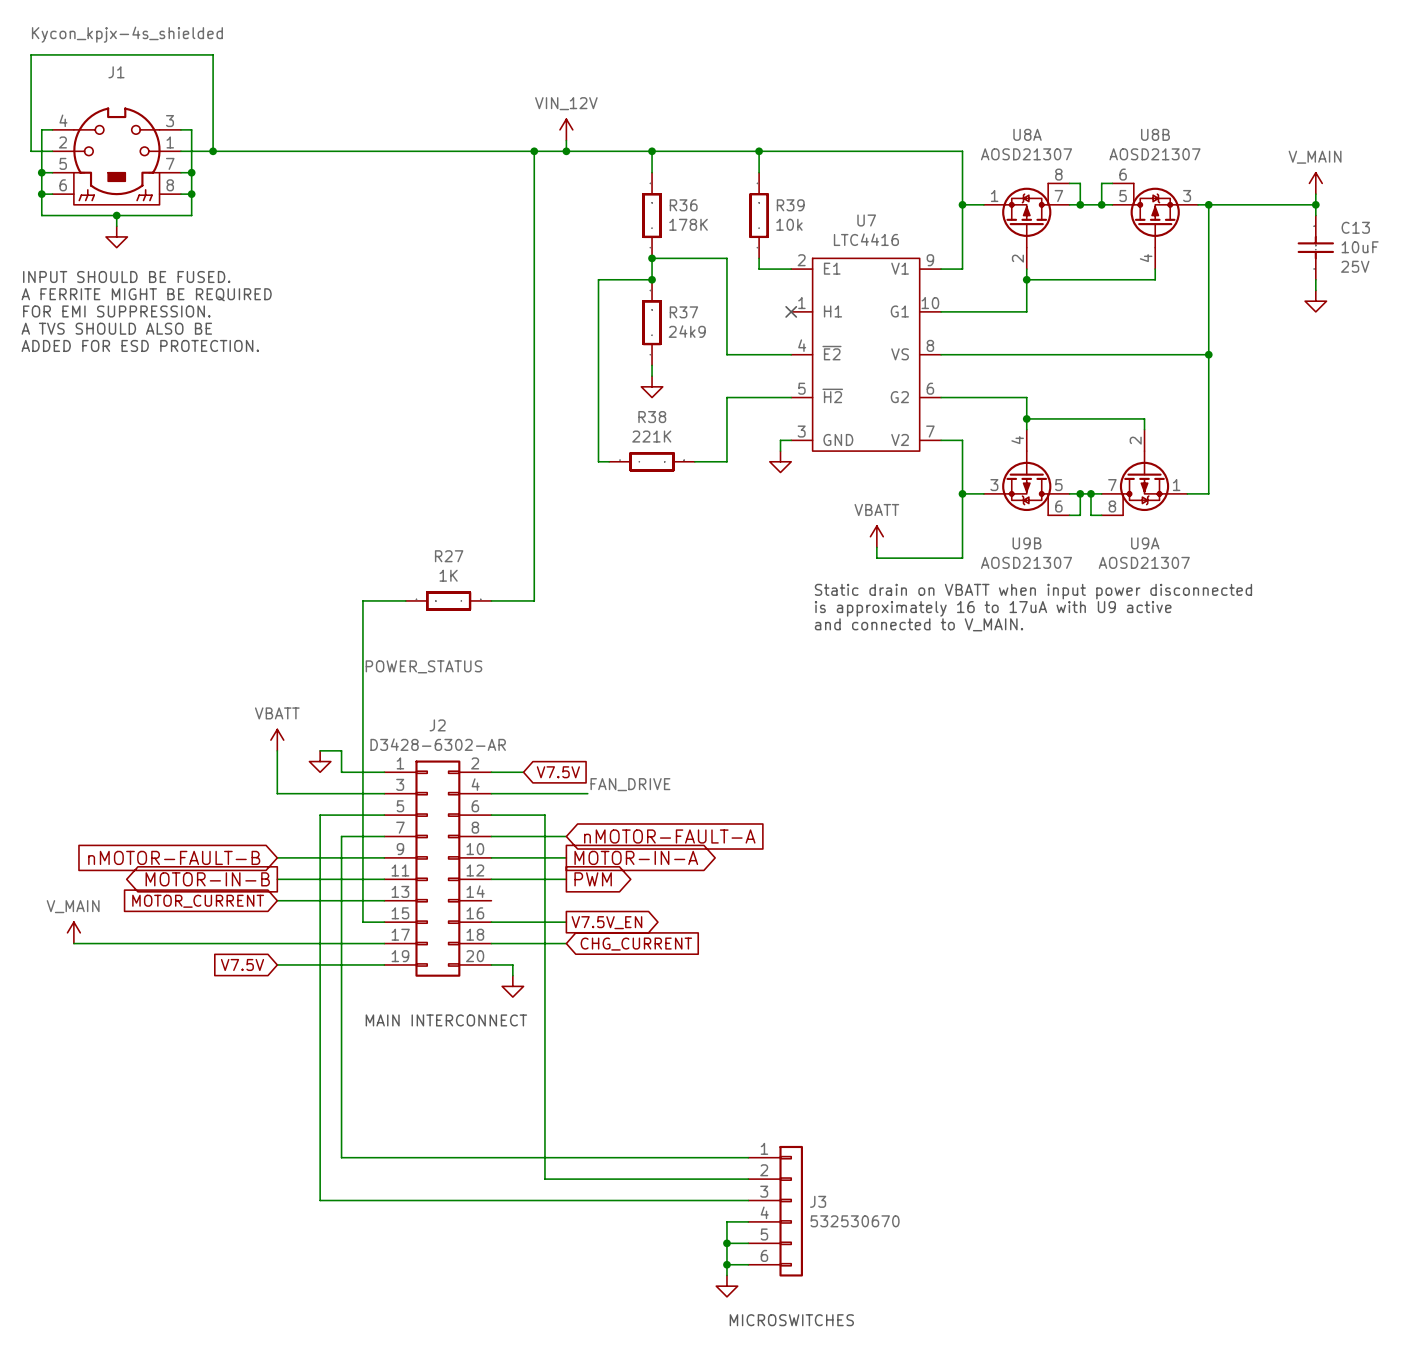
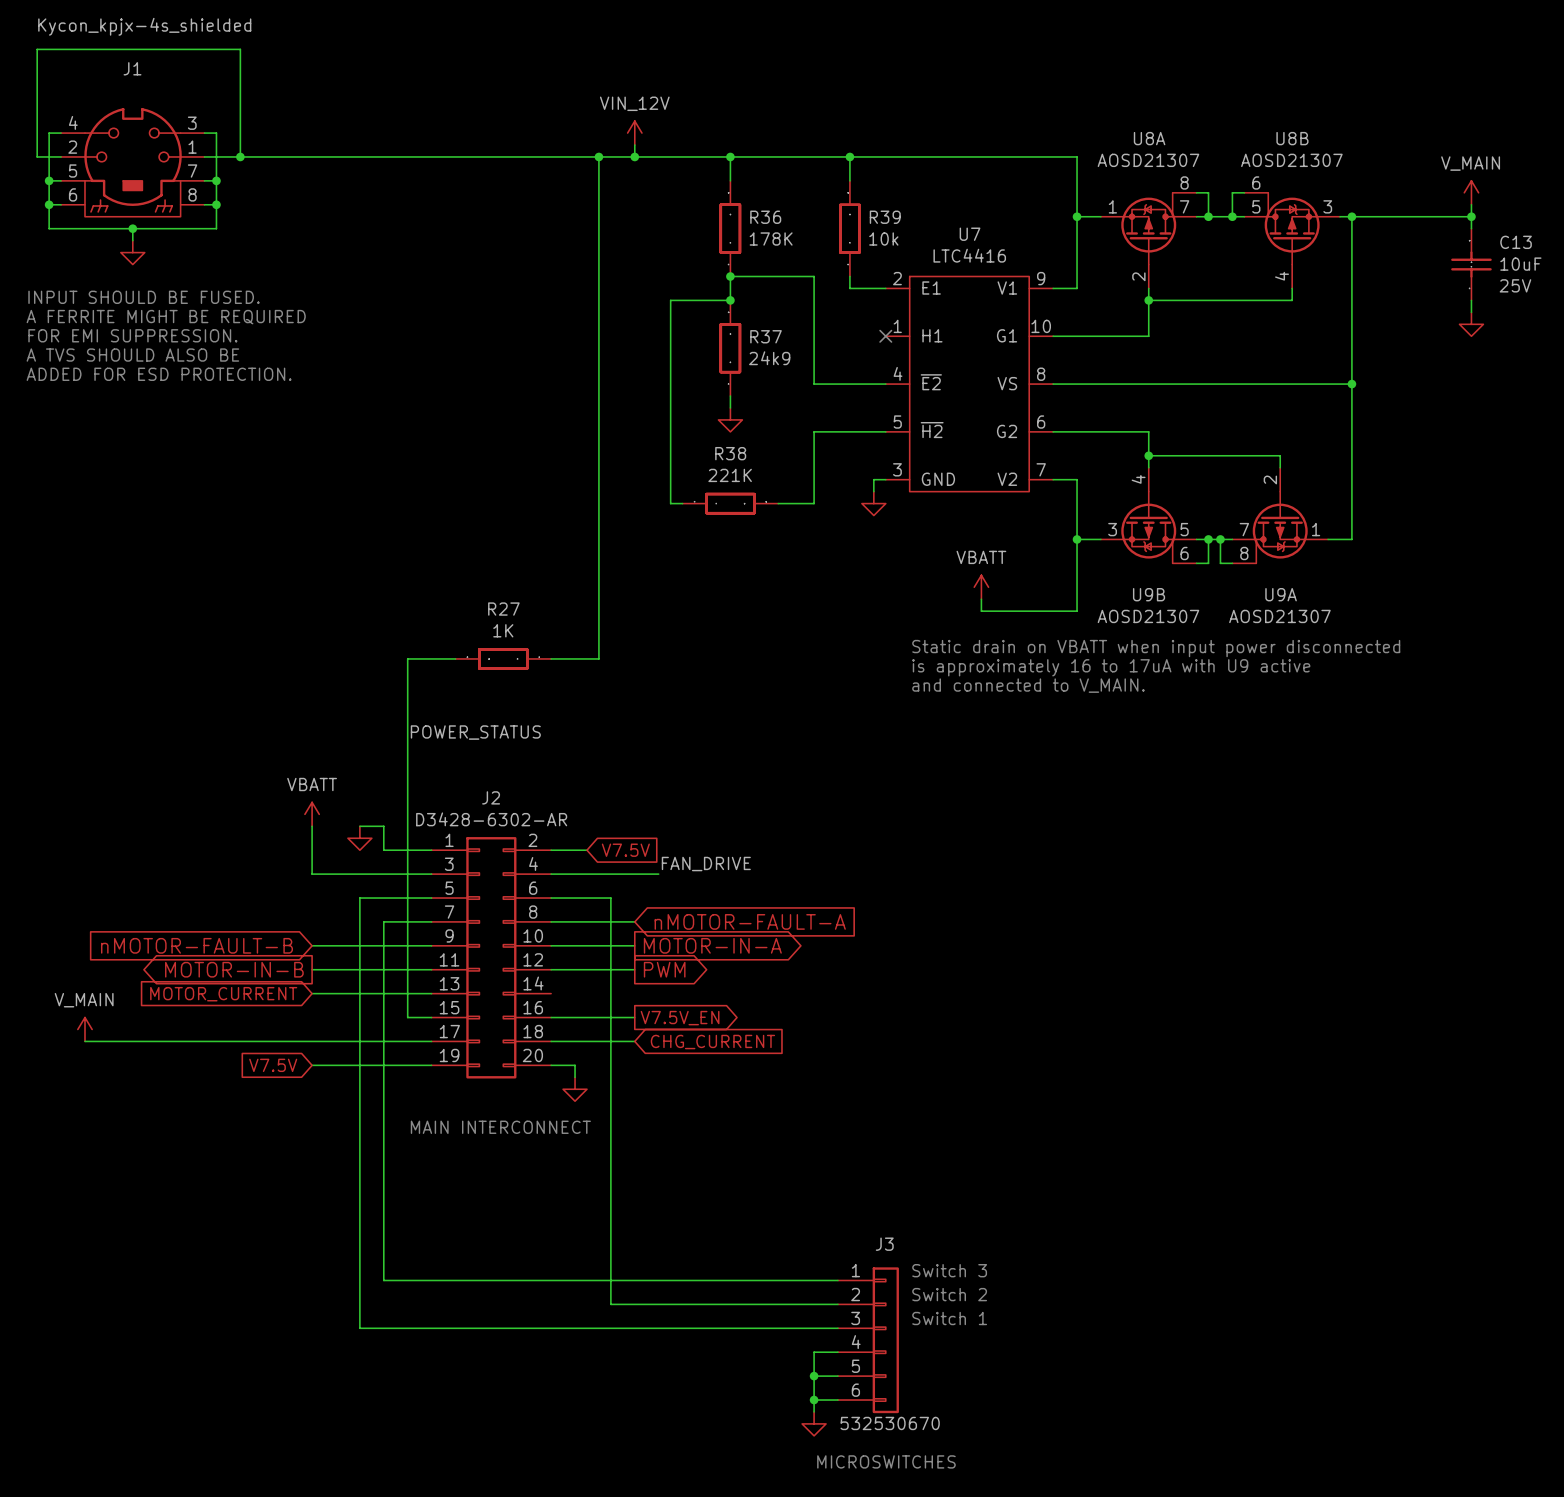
text: none -> Switch 3 (949, 1270)
text: none -> Switch 2 (949, 1294)
text: none -> Switch 1 (949, 1318)
J3 name position: J3 (818, 1201) -> J3 (884, 1244)
J3 value position: 532530670 (855, 1221) -> 532530670 (890, 1423)

